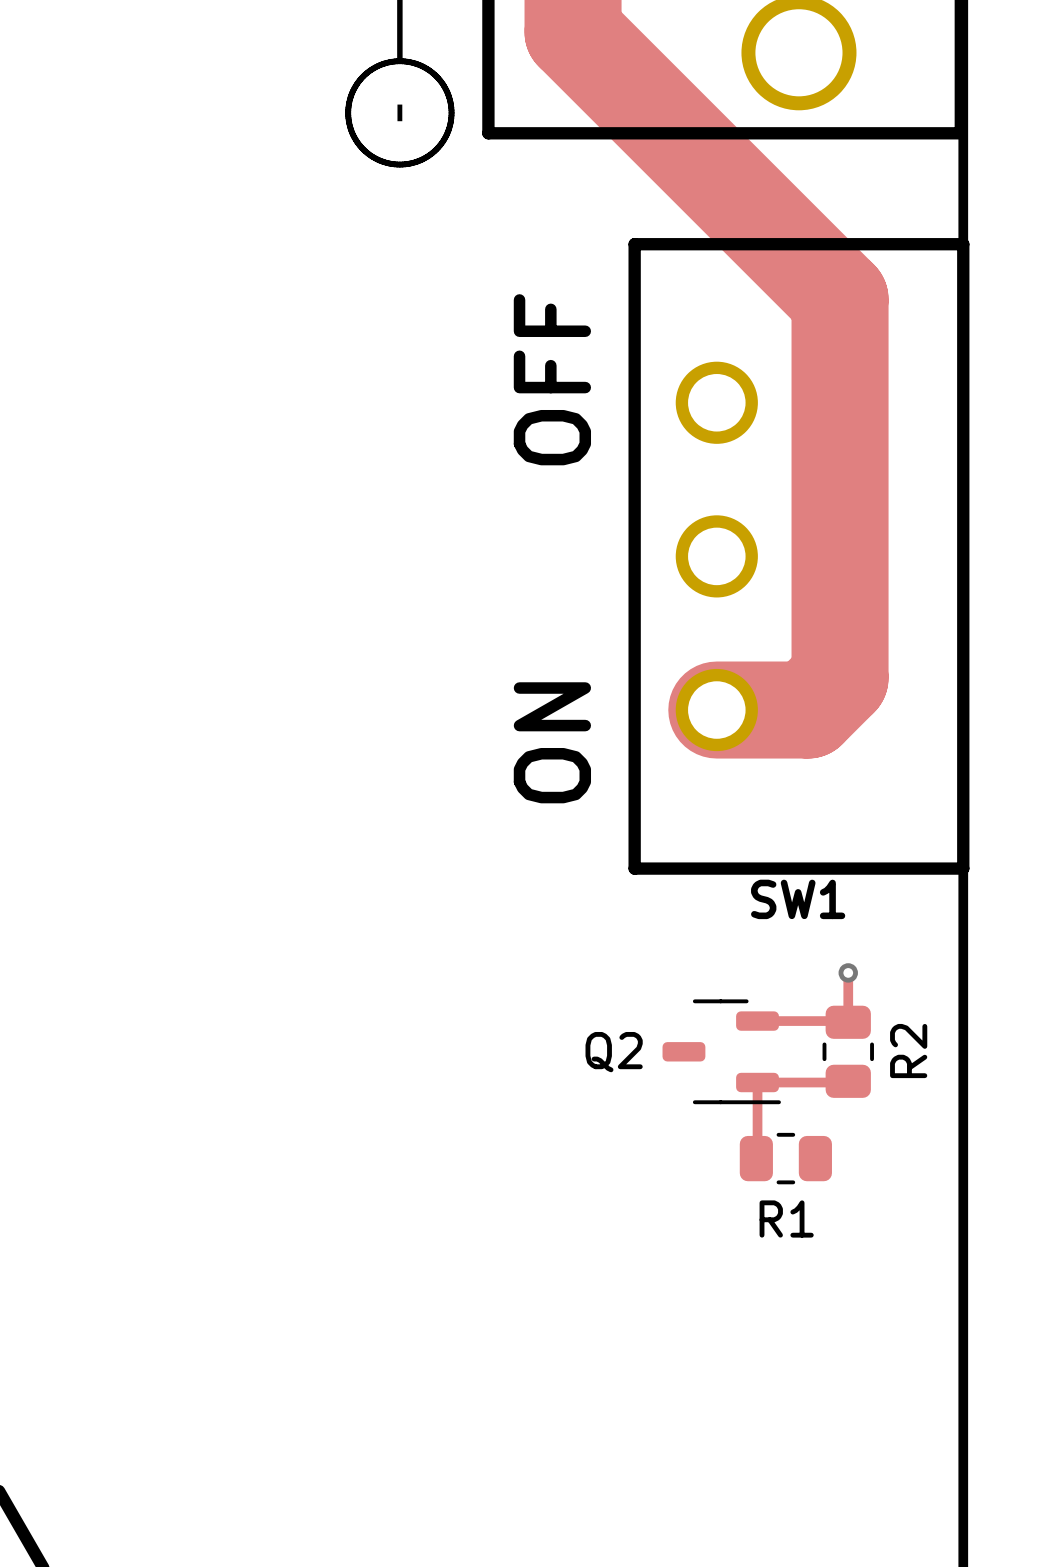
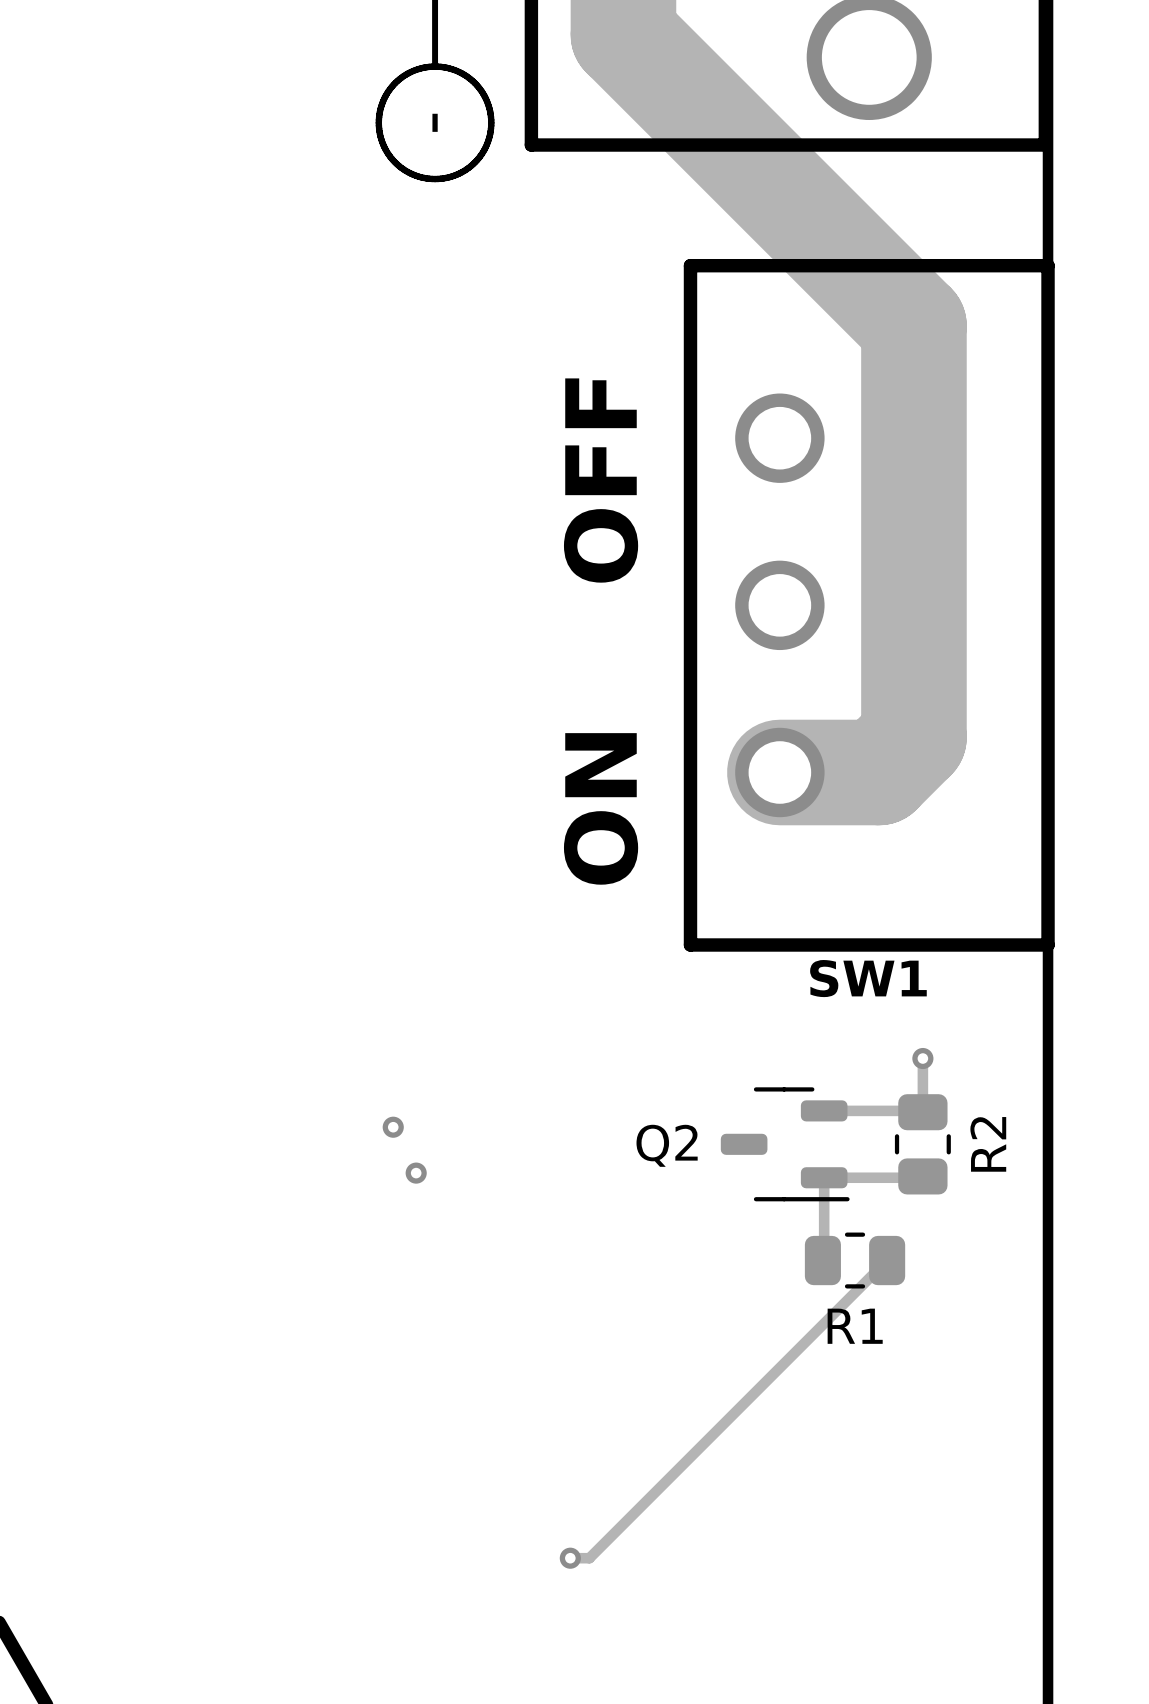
via: none -> (393, 1127)
via: none -> (416, 1173)
track: none -> (887, 1260) (589, 1558) (570, 1558)
via: none -> (570, 1558)

